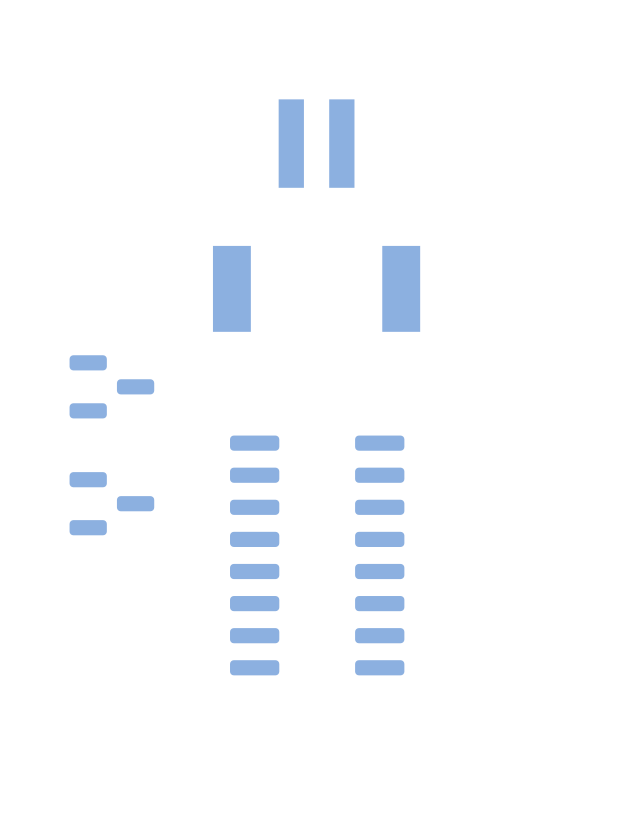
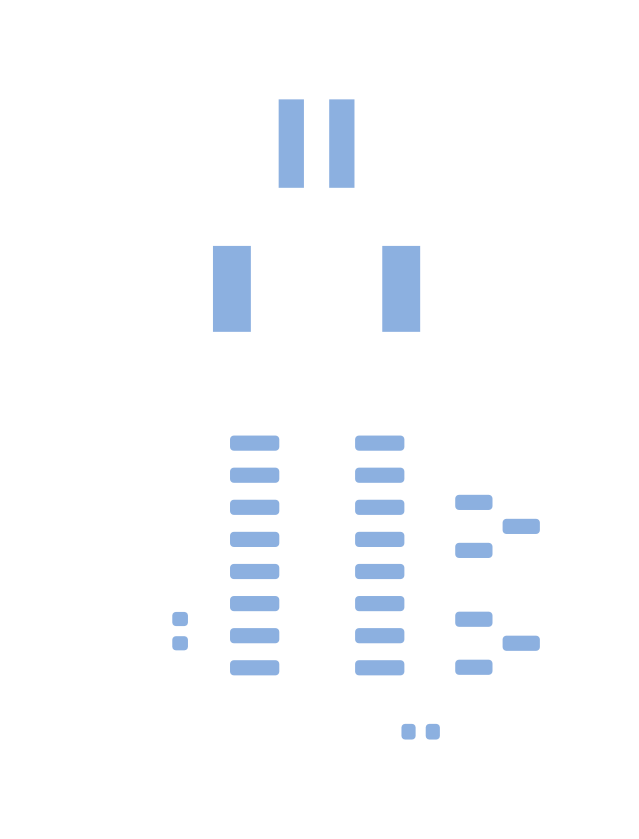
part: (111, 386) -> none
part: (111, 503) -> none
part: none -> (497, 526)
part: none -> (180, 631)
part: none -> (497, 643)
part: none -> (420, 731)

